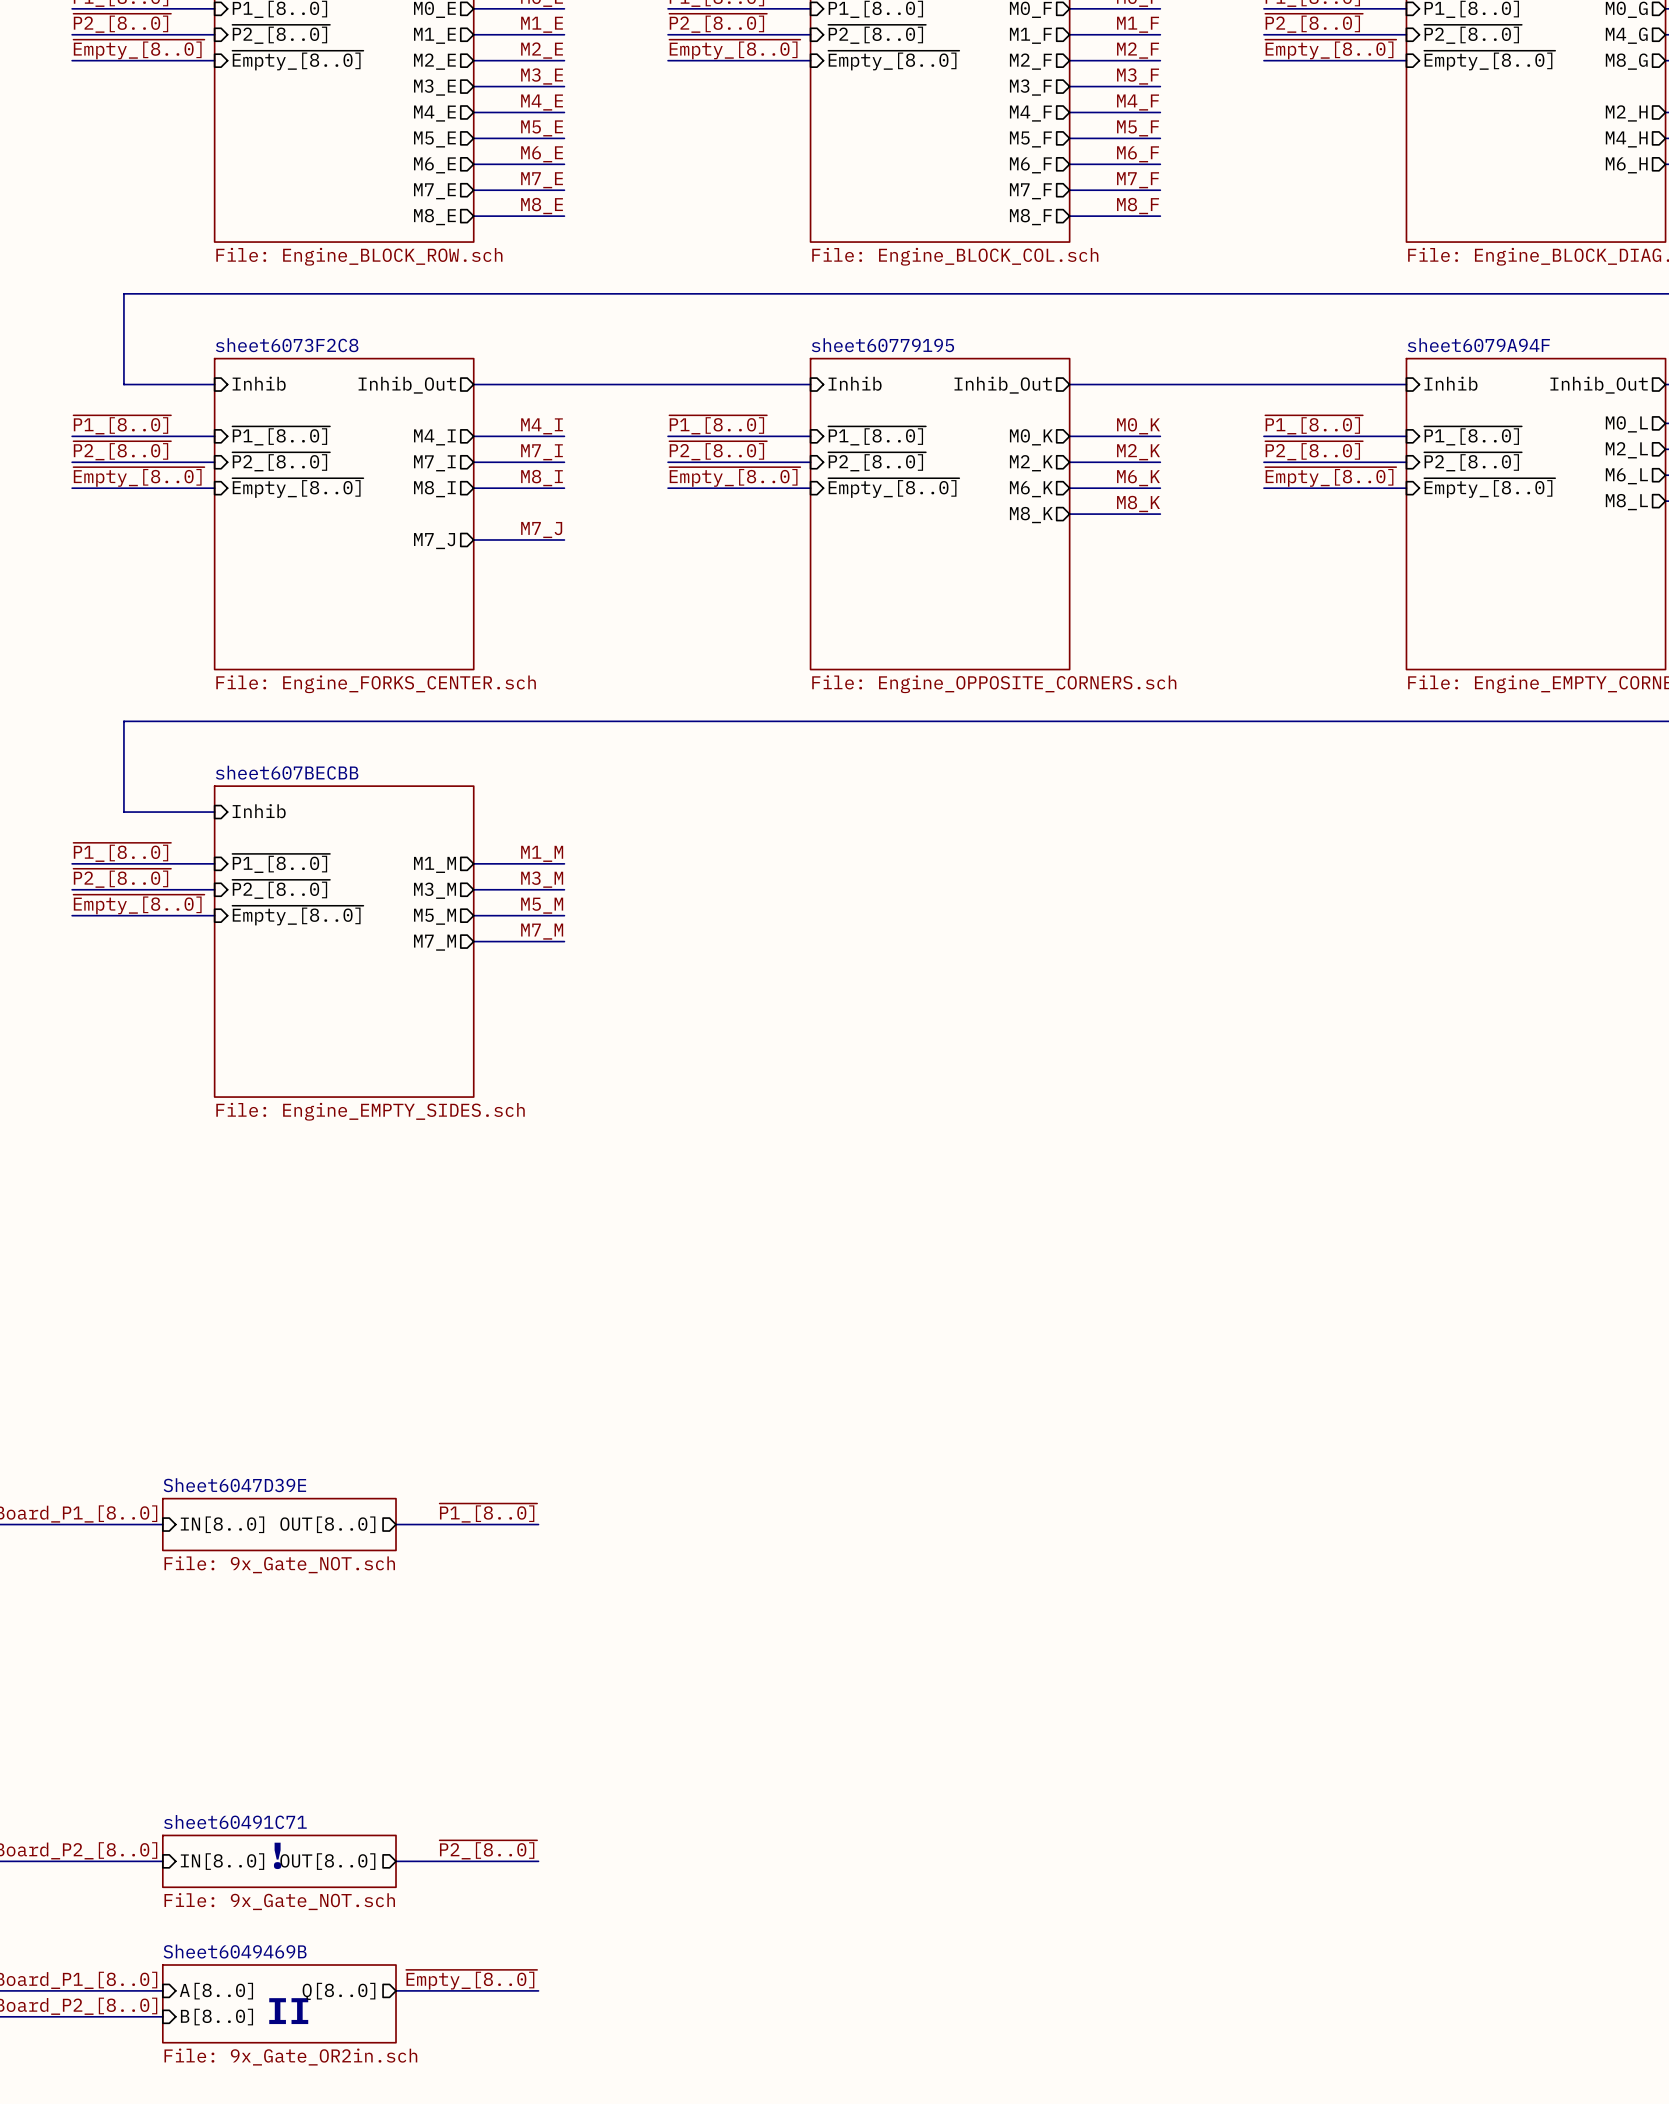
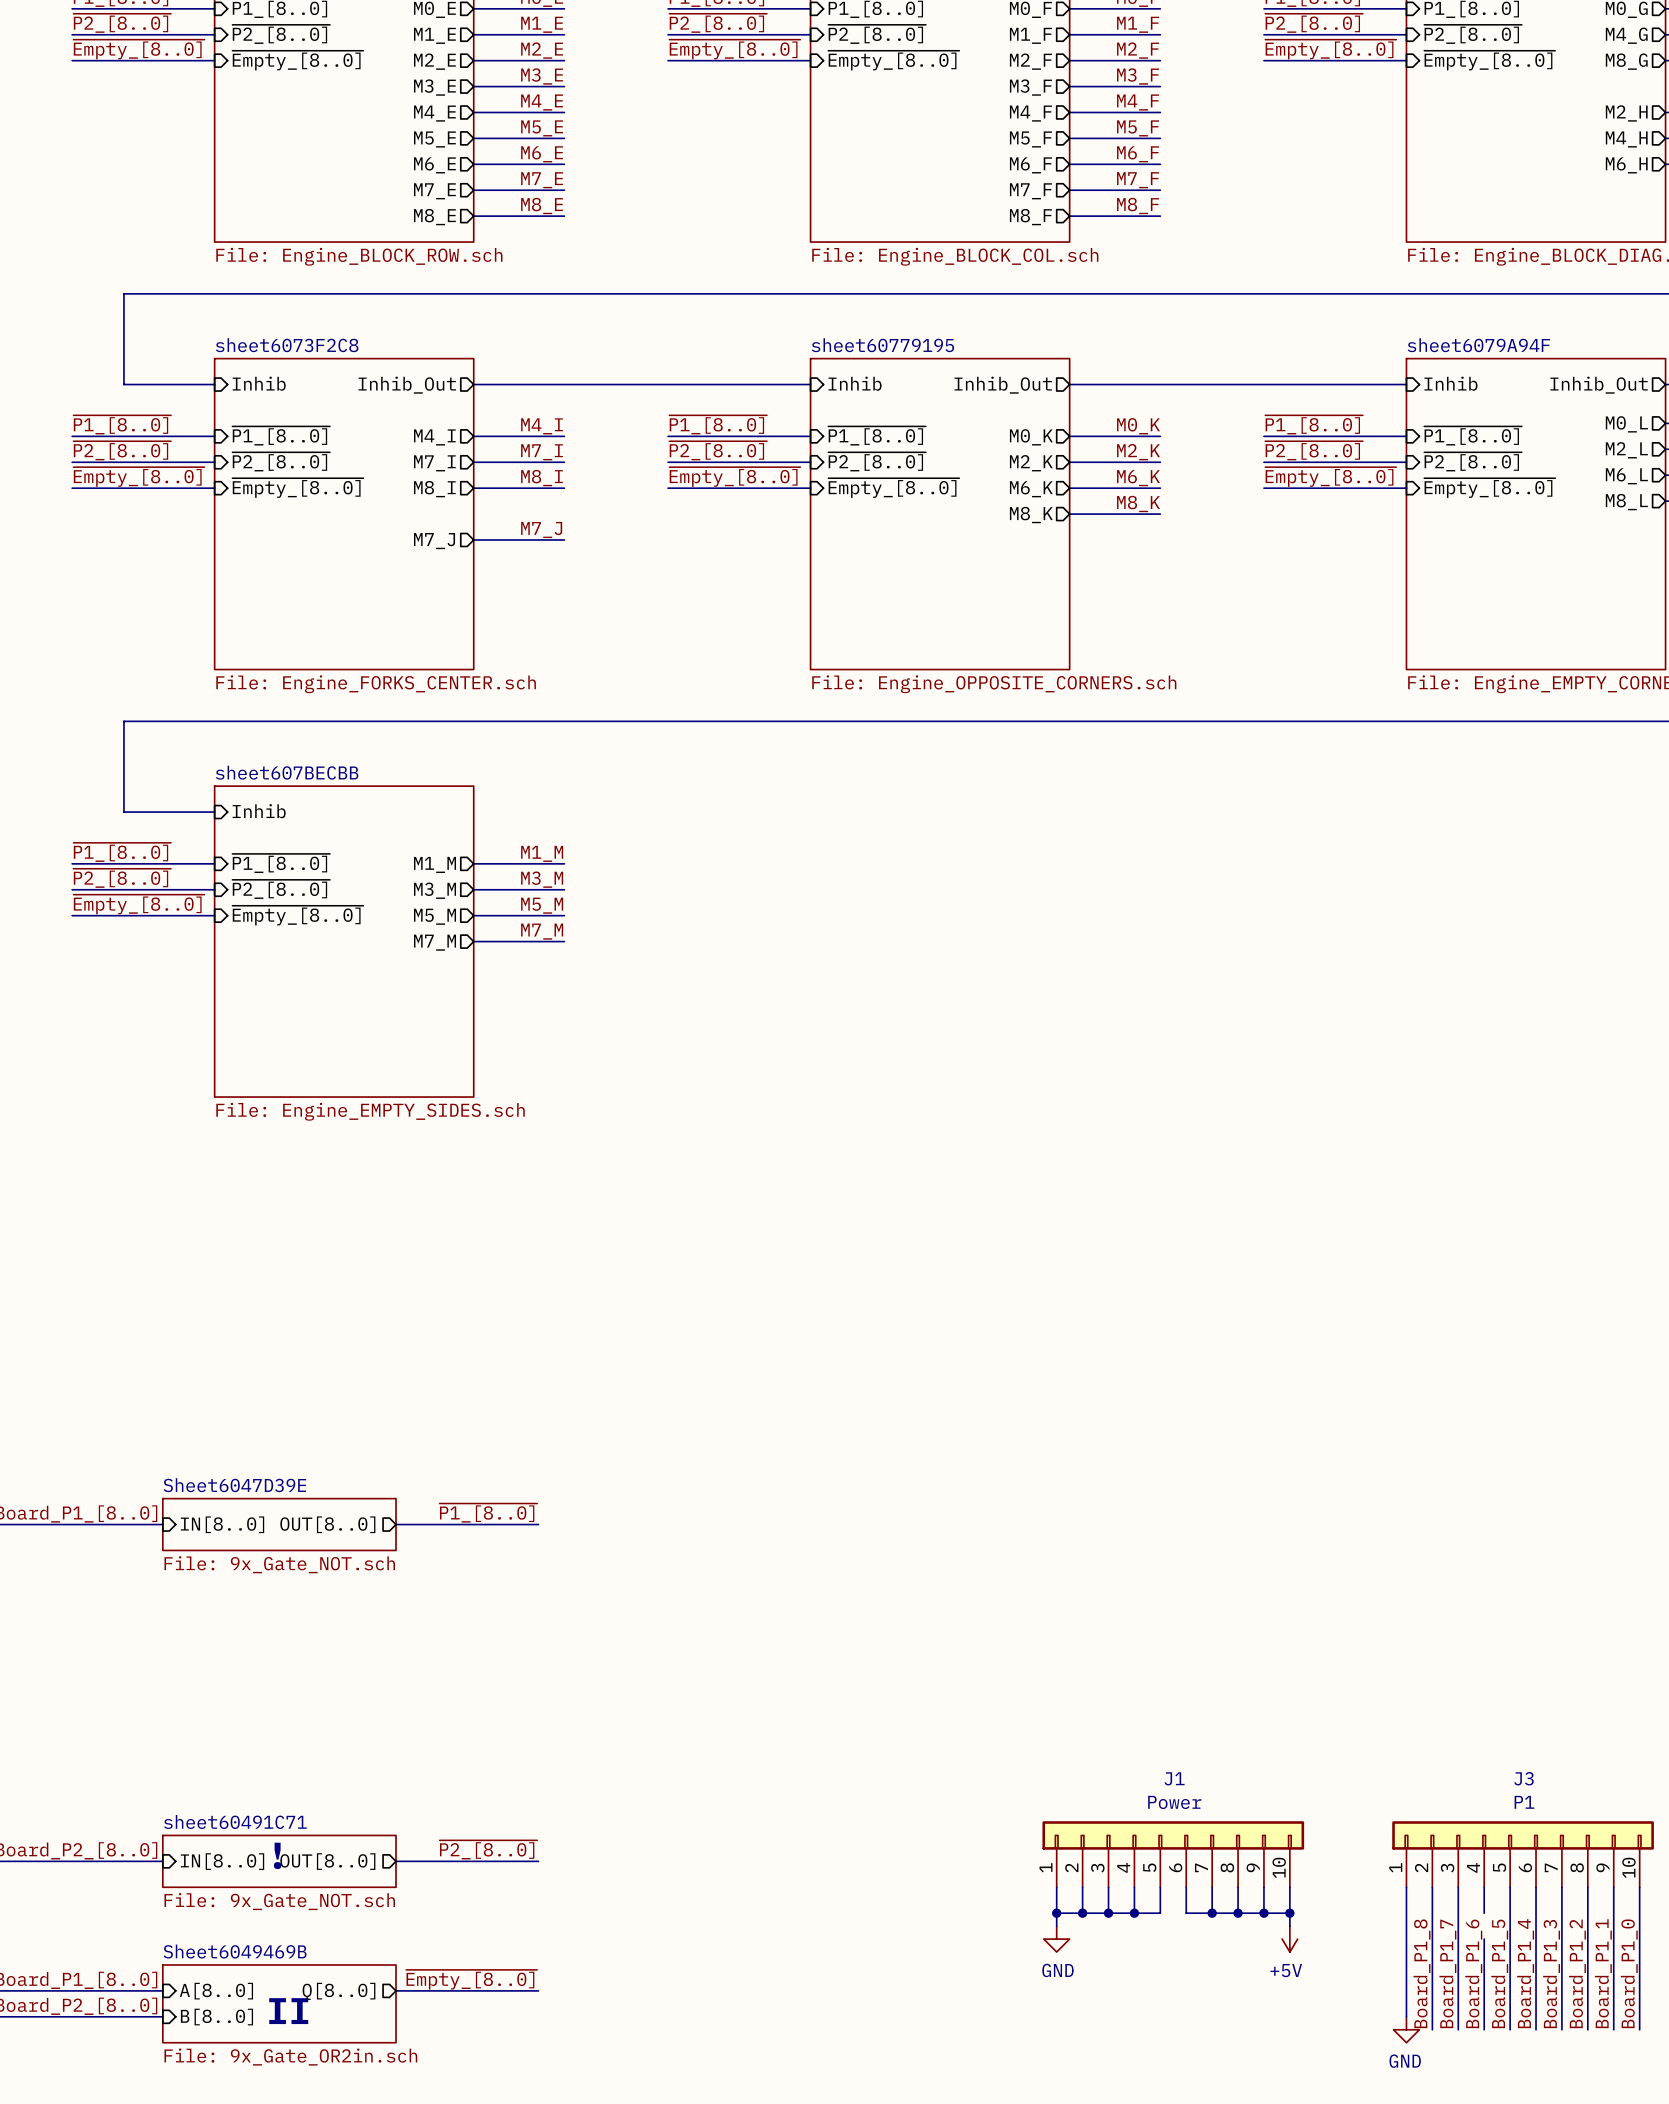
J1: none -> Power (1173, 1854)
J3: none -> P1 (1523, 1854)
wire: none -> (1056, 1887) (1056, 1926)
wire: none -> (1082, 1887) (1082, 1913)
wire: none -> (1108, 1887) (1108, 1913)
wire: none -> (1134, 1887) (1134, 1913)
wire: none -> (1160, 1887) (1160, 1913) (1056, 1913)
wire: none -> (1186, 1887) (1186, 1913) (1289, 1913)
wire: none -> (1212, 1887) (1212, 1913)
wire: none -> (1238, 1887) (1238, 1913)
wire: none -> (1263, 1887) (1263, 1913)
wire: none -> (1289, 1887) (1289, 1926)
wire: none -> (1406, 1887) (1406, 2016)
wire: none -> (1432, 1887) (1432, 2029)
wire: none -> (1458, 1887) (1458, 2029)
wire: none -> (1484, 1887) (1484, 1913)
wire: none -> (1510, 1887) (1510, 2029)
wire: none -> (1536, 1887) (1536, 2029)
wire: none -> (1561, 1887) (1561, 2029)
wire: none -> (1587, 1887) (1587, 2029)
wire: none -> (1613, 1887) (1613, 2029)
wire: none -> (1639, 1887) (1639, 2029)
junction: none -> (1056, 1913)
junction: none -> (1082, 1913)
junction: none -> (1108, 1913)
junction: none -> (1134, 1913)
junction: none -> (1212, 1913)
junction: none -> (1238, 1913)
junction: none -> (1263, 1913)
junction: none -> (1289, 1913)
power symbol: none -> GND (1056, 1939)
power symbol: none -> +5V (1289, 1939)
wire: none -> (1484, 1939) (1484, 2029)
label: none -> Board_P1_8 (1421, 1973)
label: none -> Board_P1_7 (1447, 1973)
label: none -> Board_P1_6 (1473, 1973)
label: none -> Board_P1_5 (1499, 1973)
label: none -> Board_P1_4 (1525, 1973)
label: none -> Board_P1_2 (1577, 1973)
label: none -> Board_P1_1 (1603, 1973)
label: none -> Board_P1_0 (1629, 1973)
label: none -> Board_P1_3 (1551, 1974)
power symbol: none -> GND (1406, 2029)

